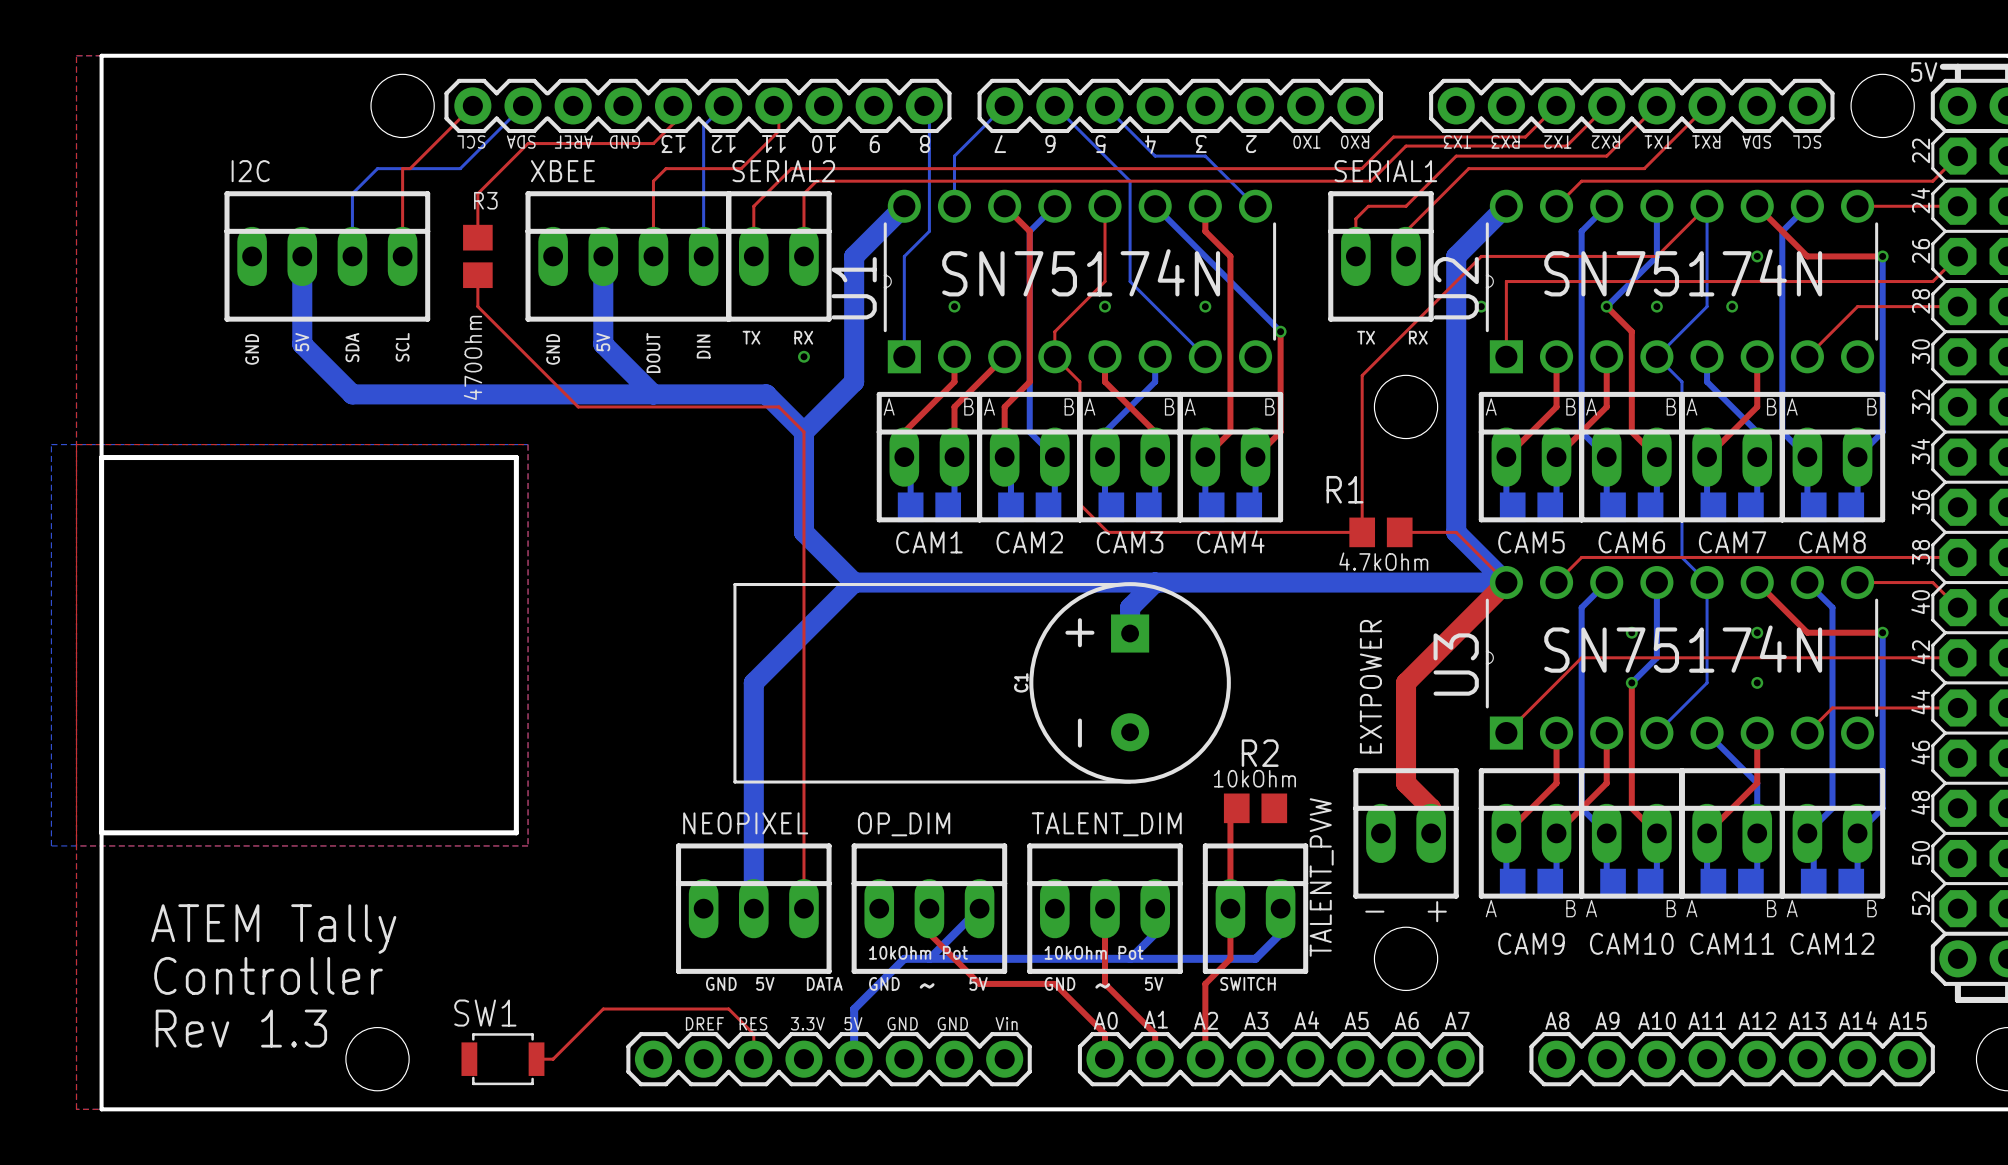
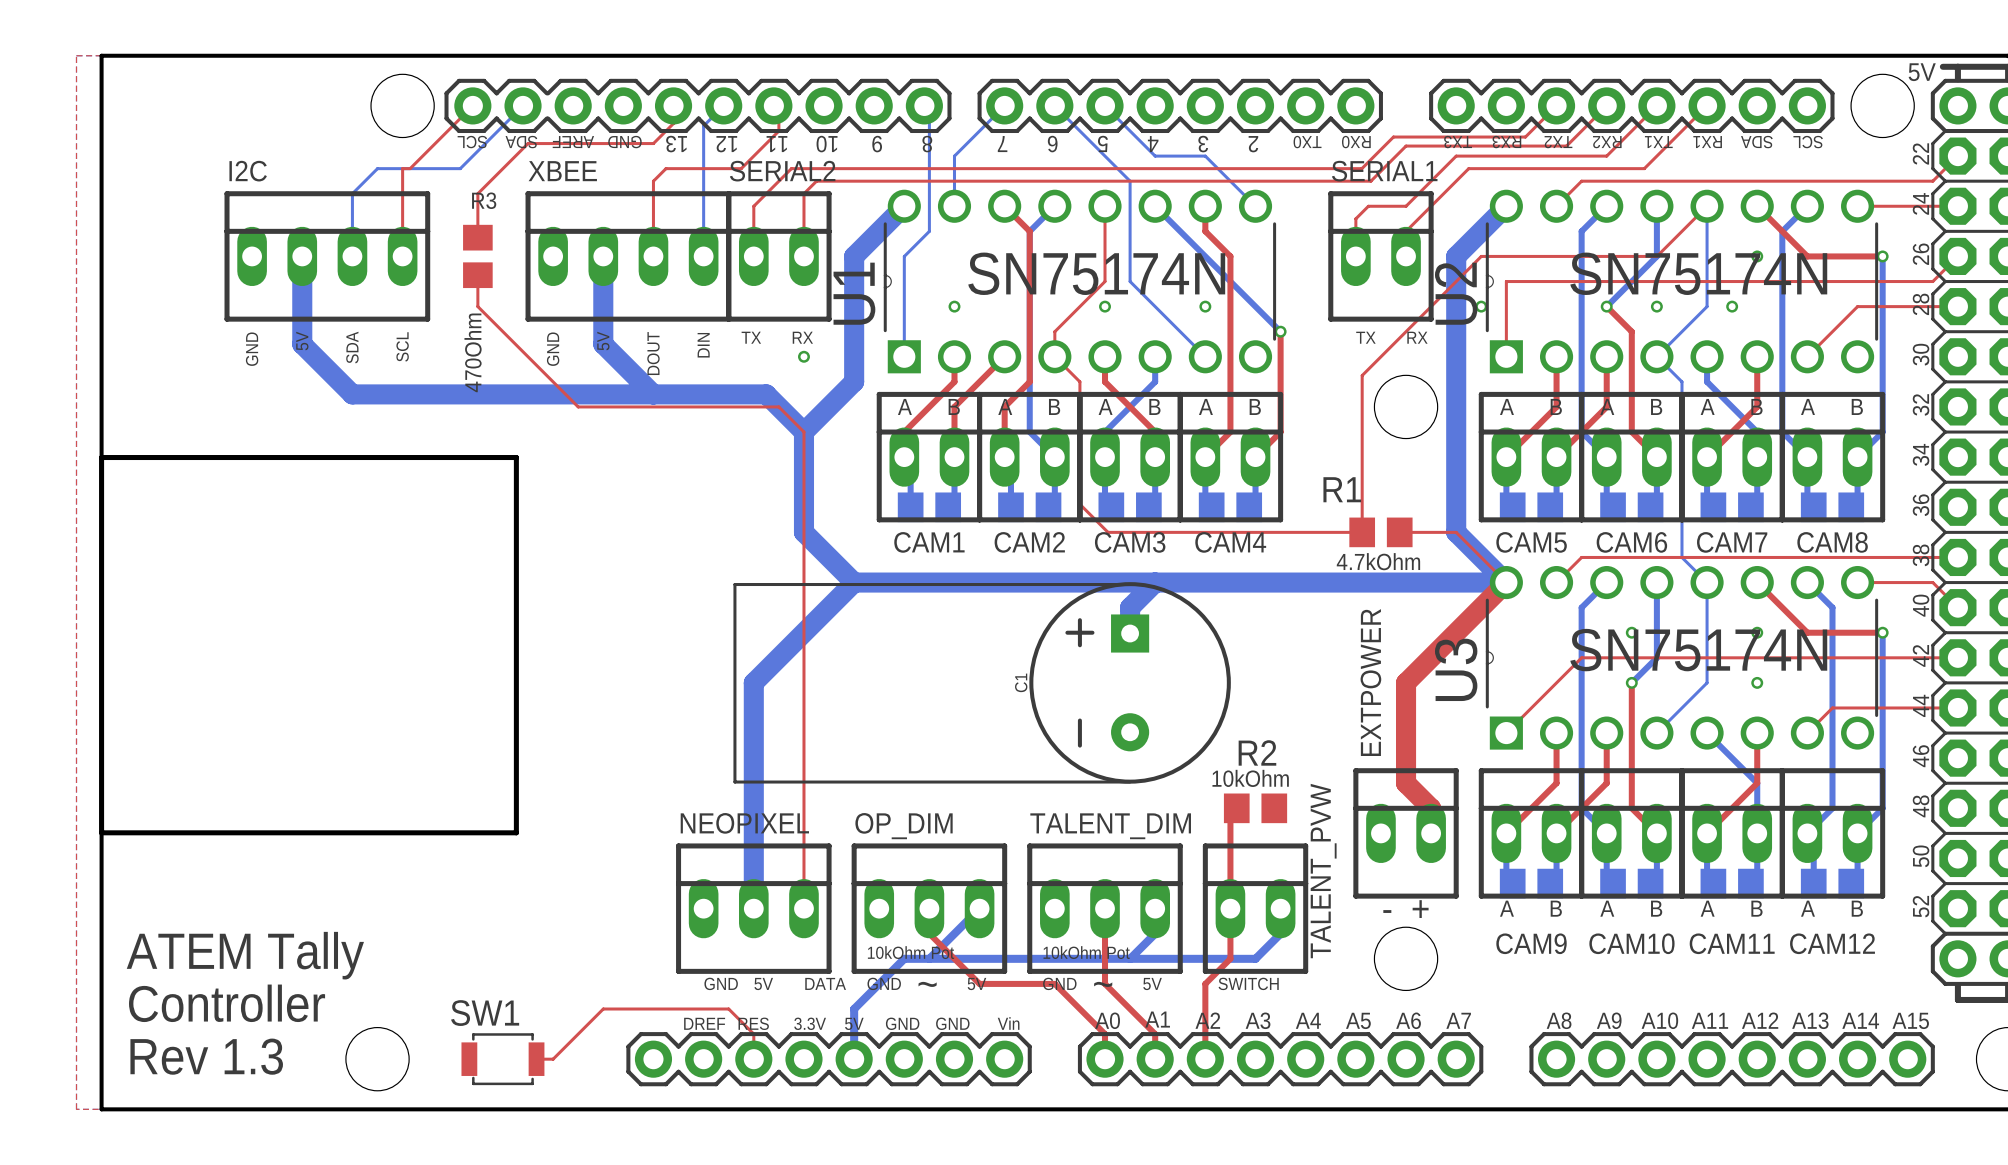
bottom zone outline: (51, 444) (528, 444) (528, 845) (51, 845) (51, 444) -> none
top zone outline: (76, 444) (528, 444) (528, 845) (76, 845) -> none
text position: ATEM Tally (273, 929) -> ATEM Tally (245, 955)
text position: Controller (268, 975) -> Controller (227, 1003)
text position: Rev 1.3 (241, 1028) -> Rev 1.3 (206, 1056)

